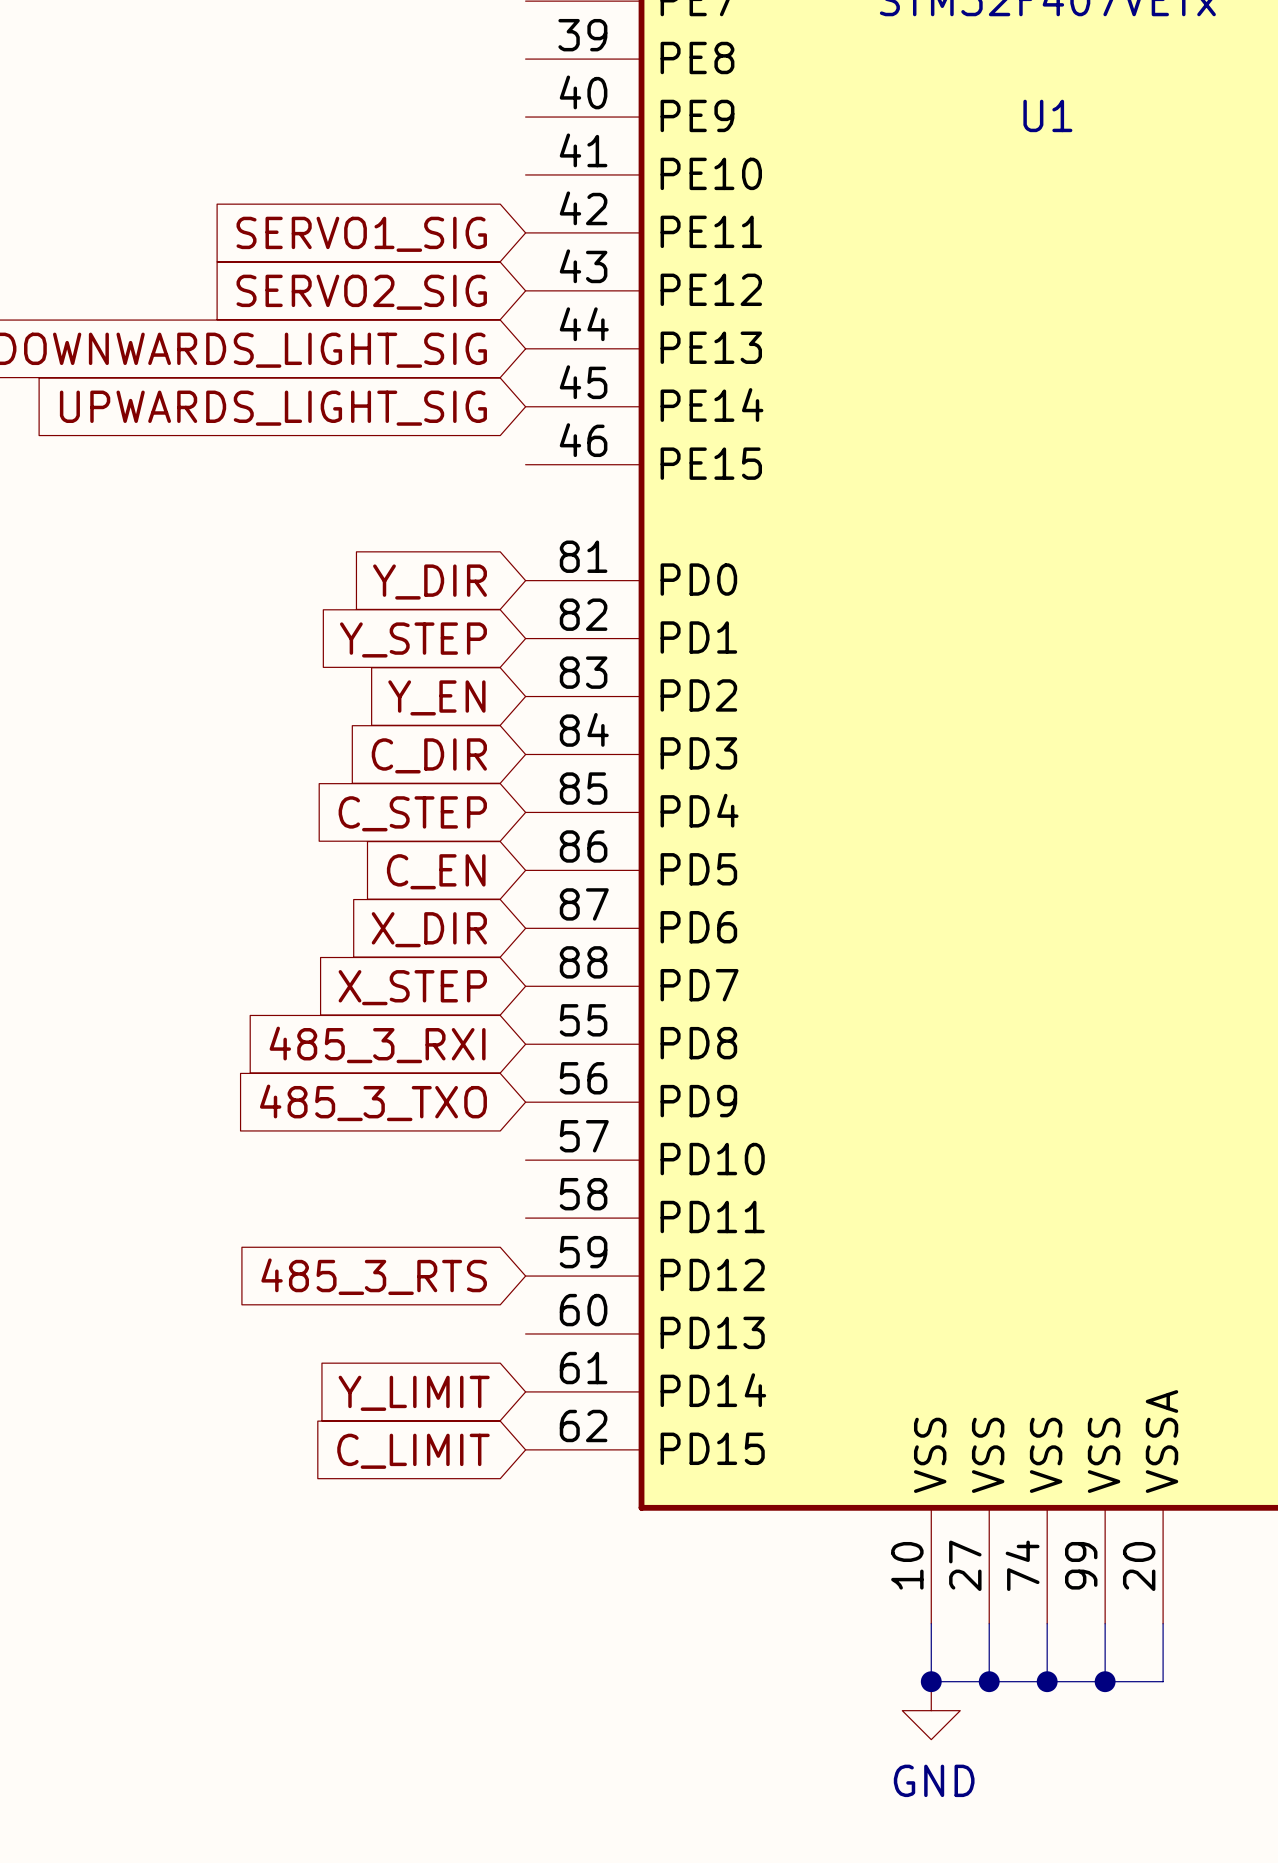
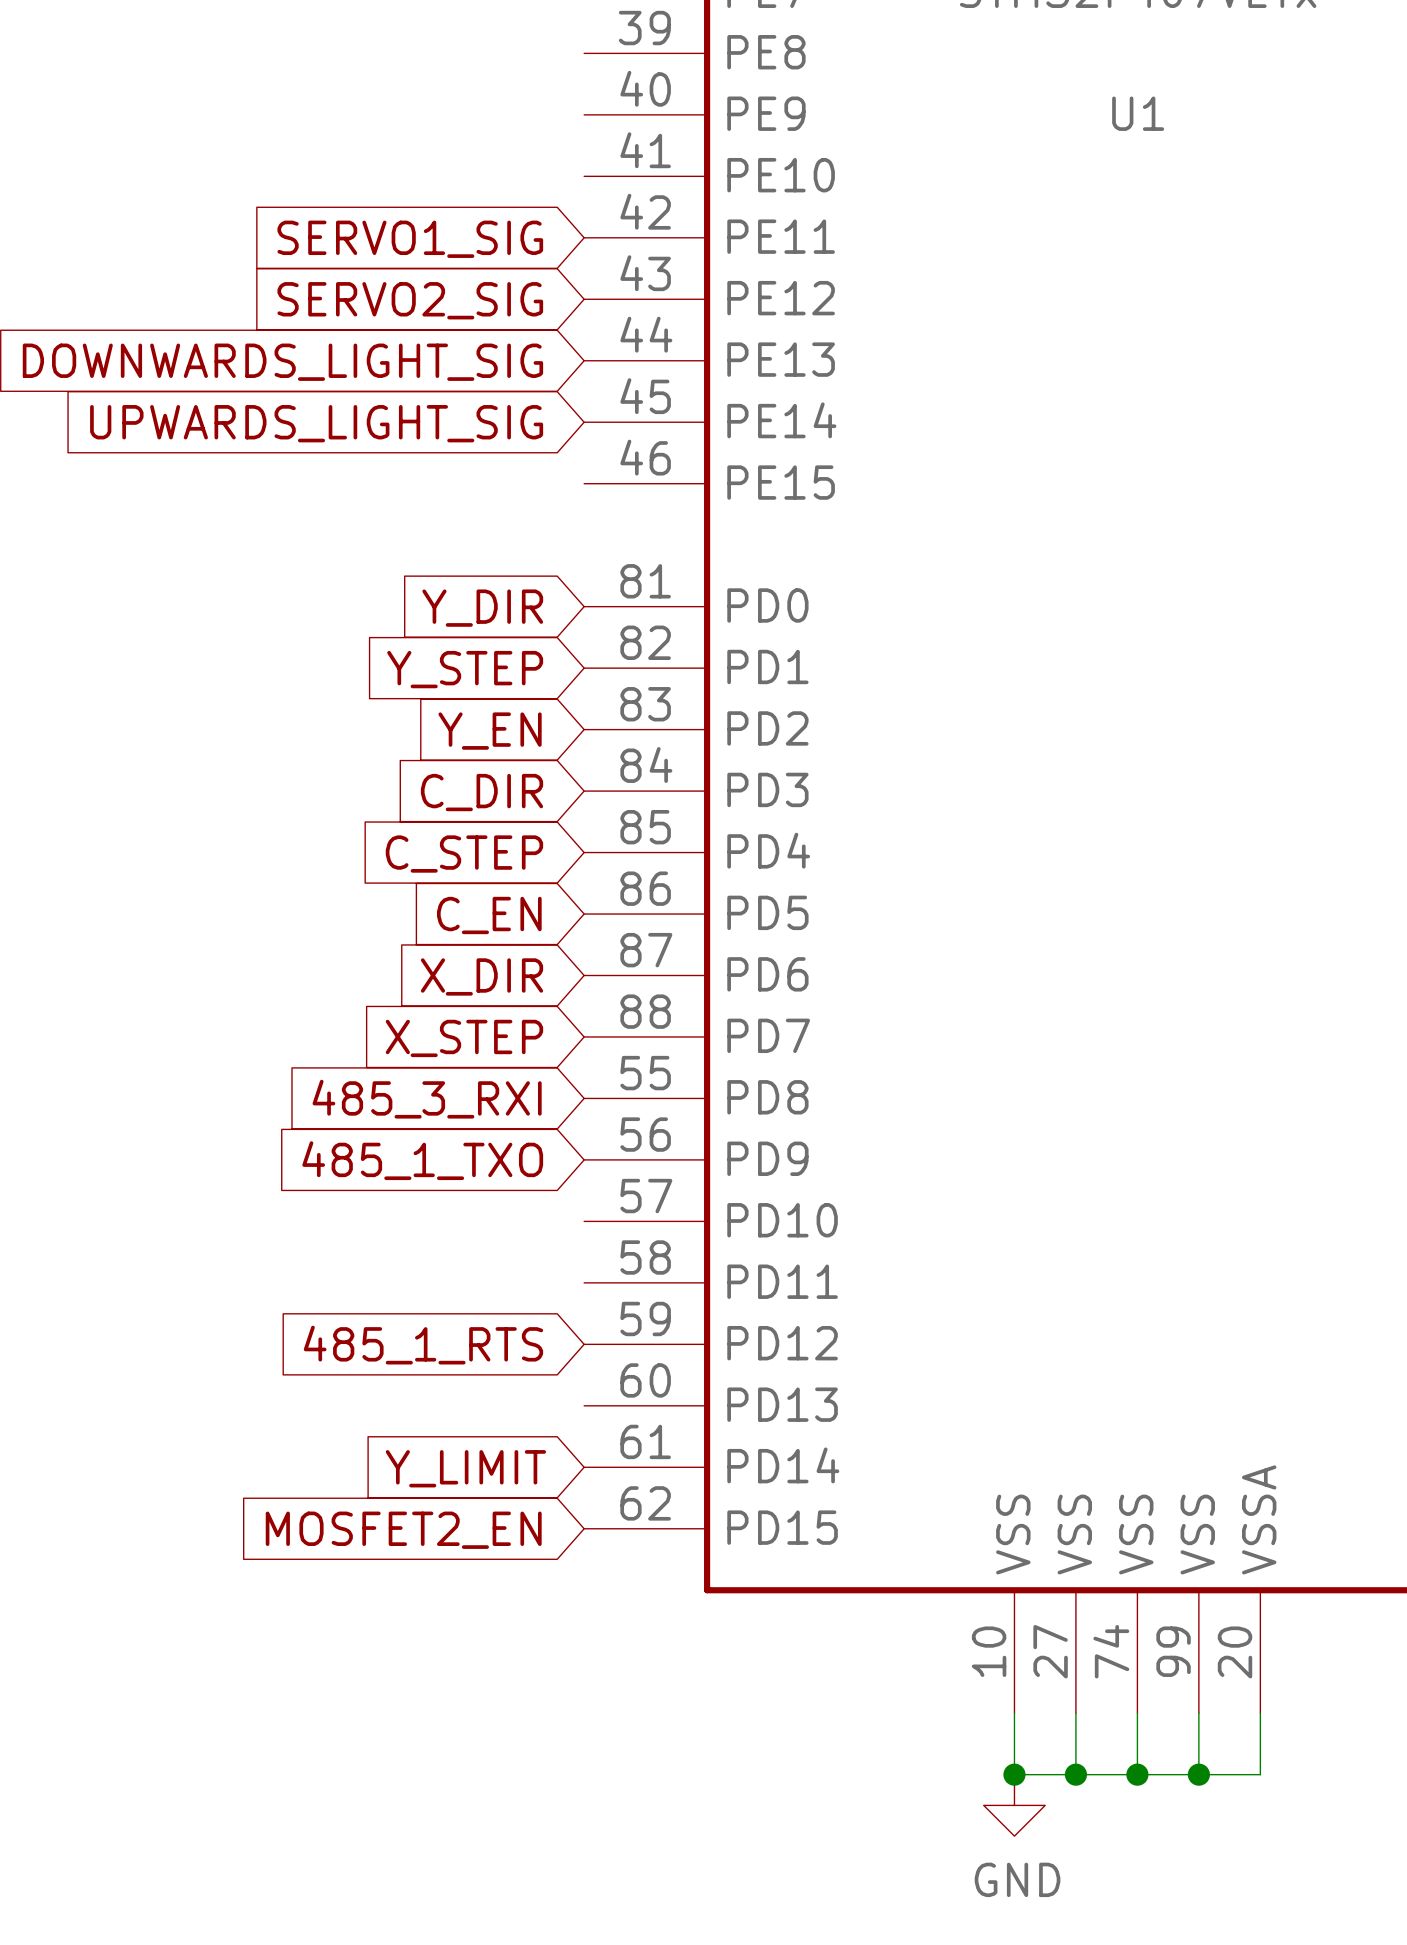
global label: 485_3_TXO (373, 1102) -> 485_1_TXO (422, 1160)
global label: 485_3_RTS (374, 1276) -> 485_1_RTS (423, 1345)
global label: C_LIMIT (413, 1451) -> MOSFET2_EN (403, 1530)

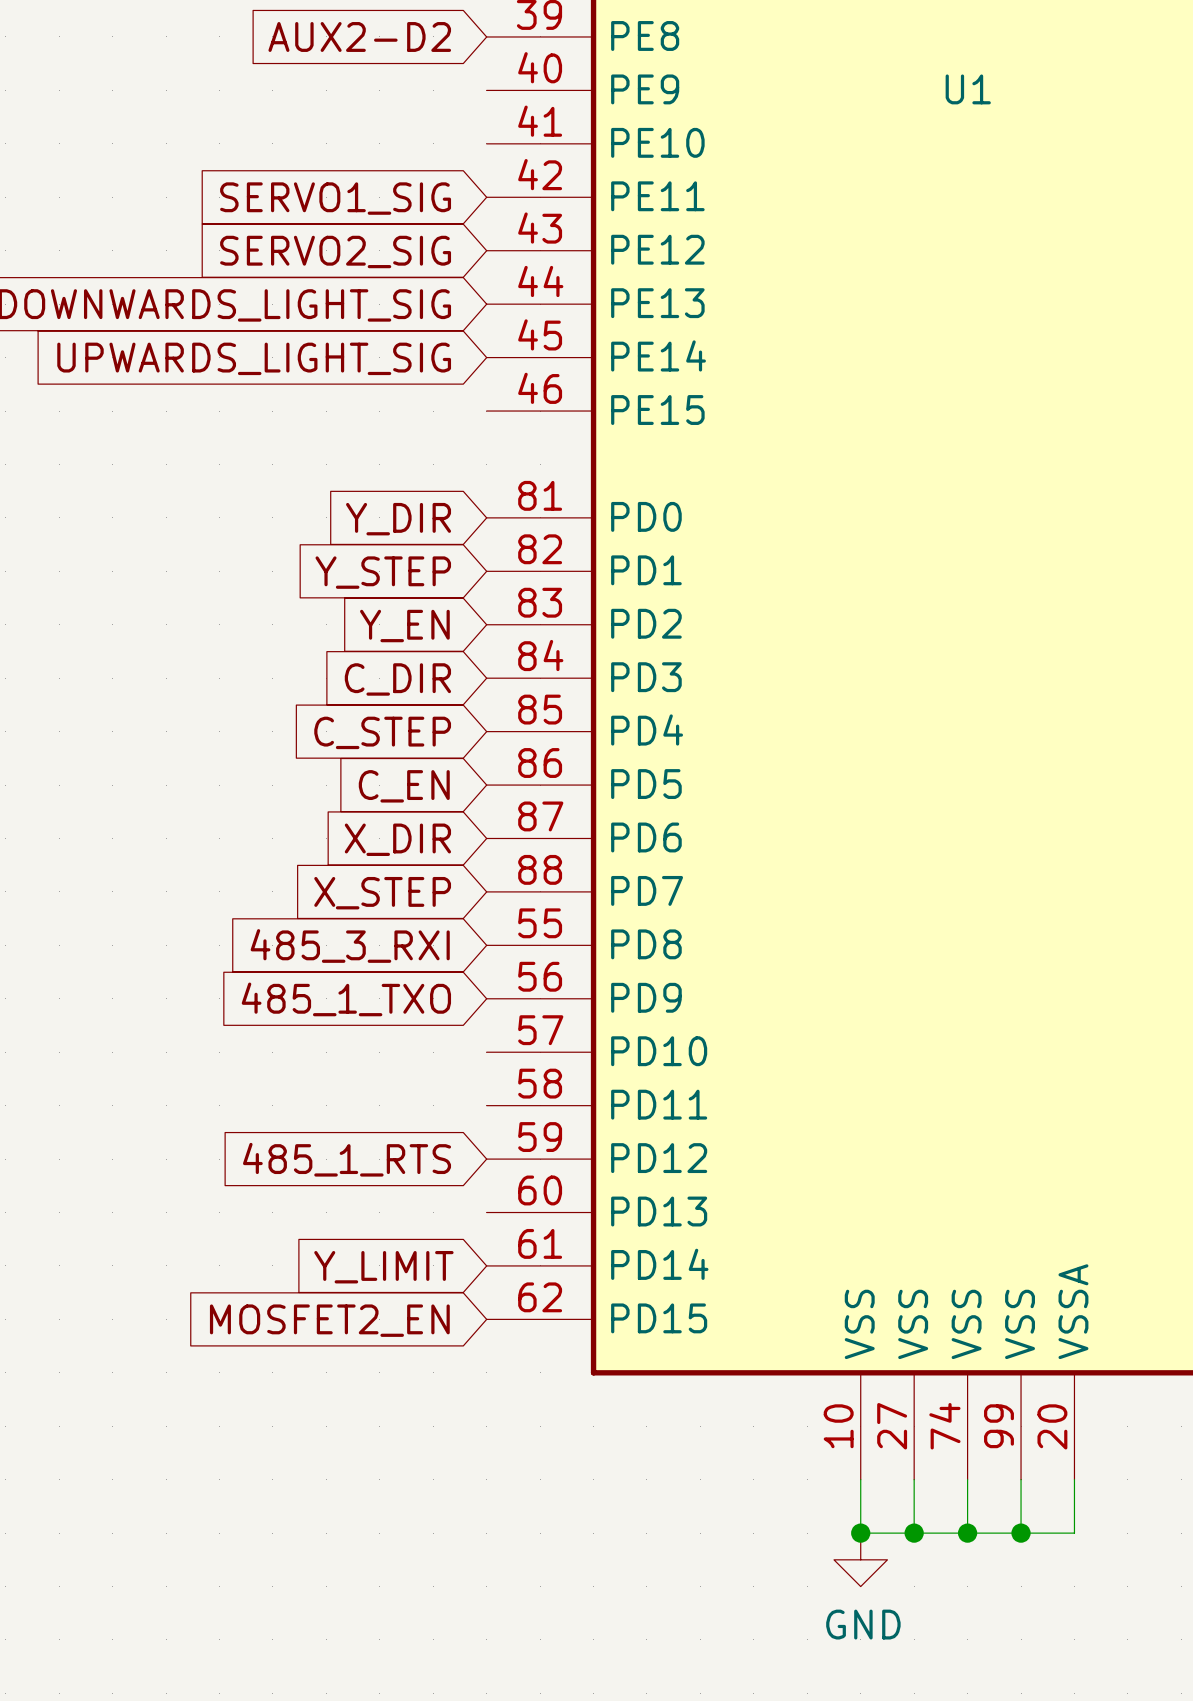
global label: none -> AUX2-D2 (359, 36)

